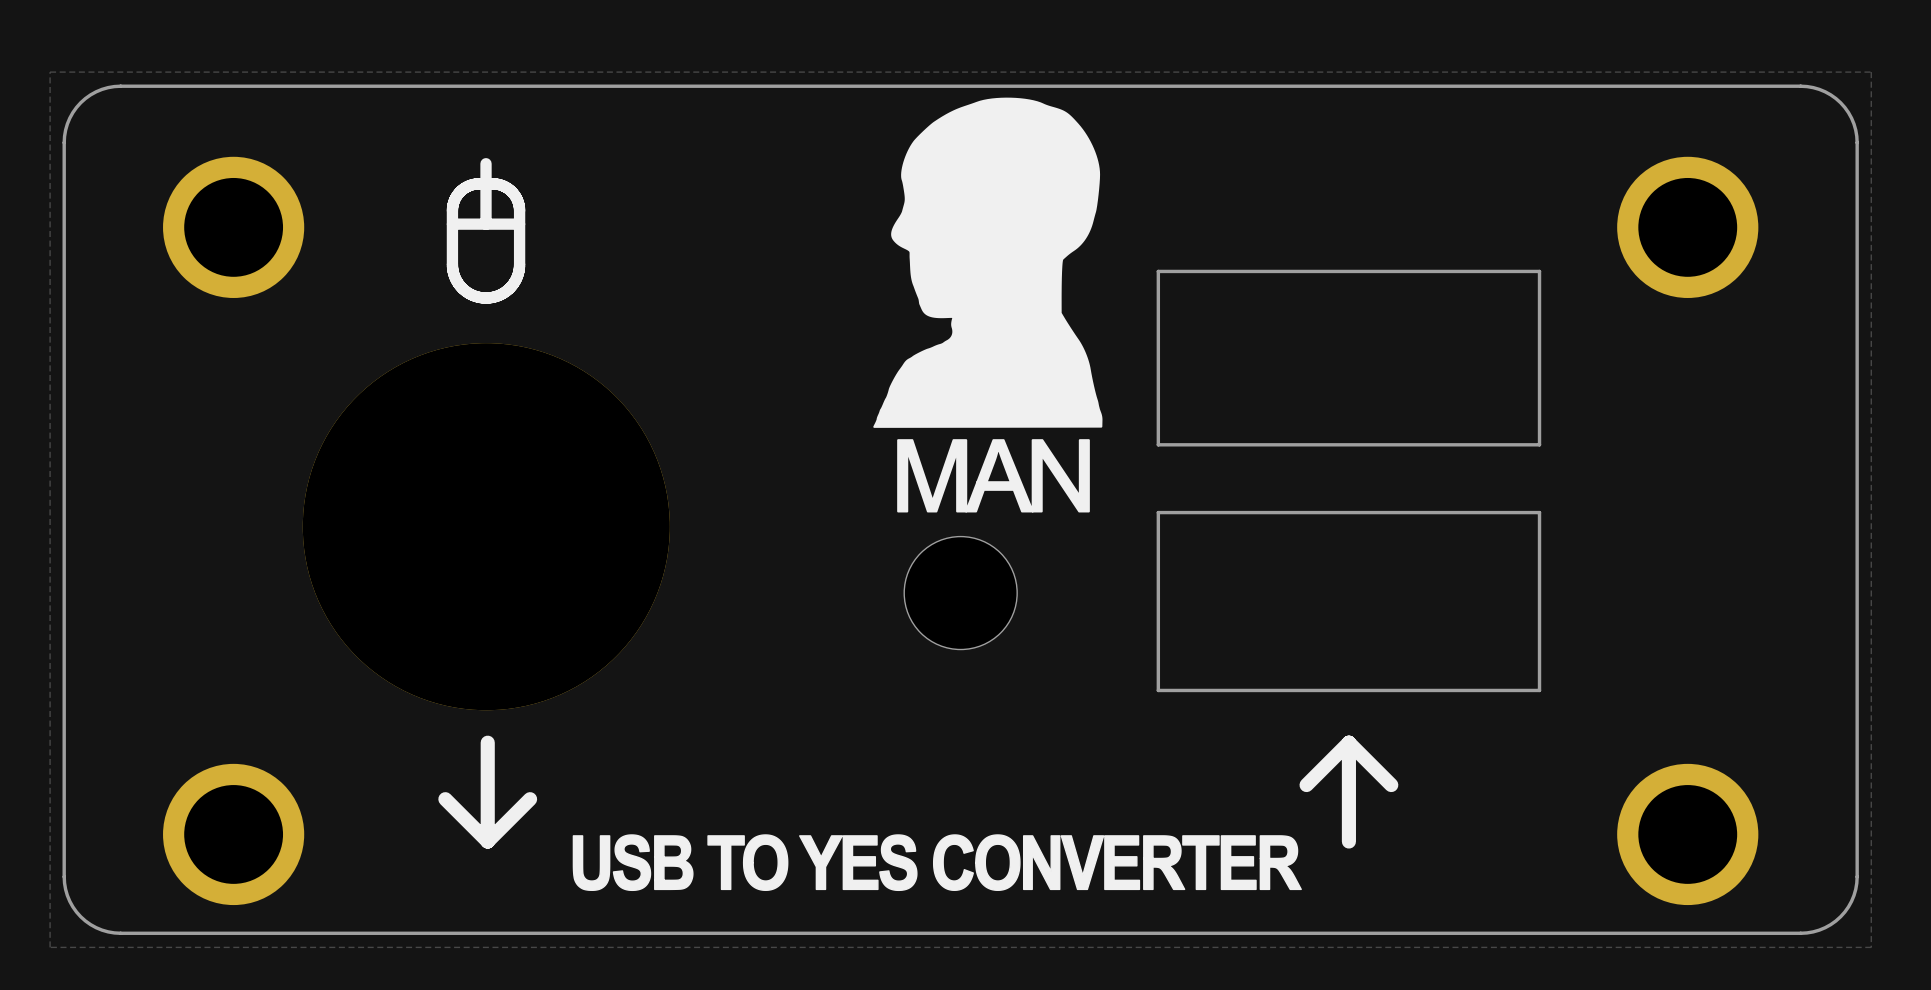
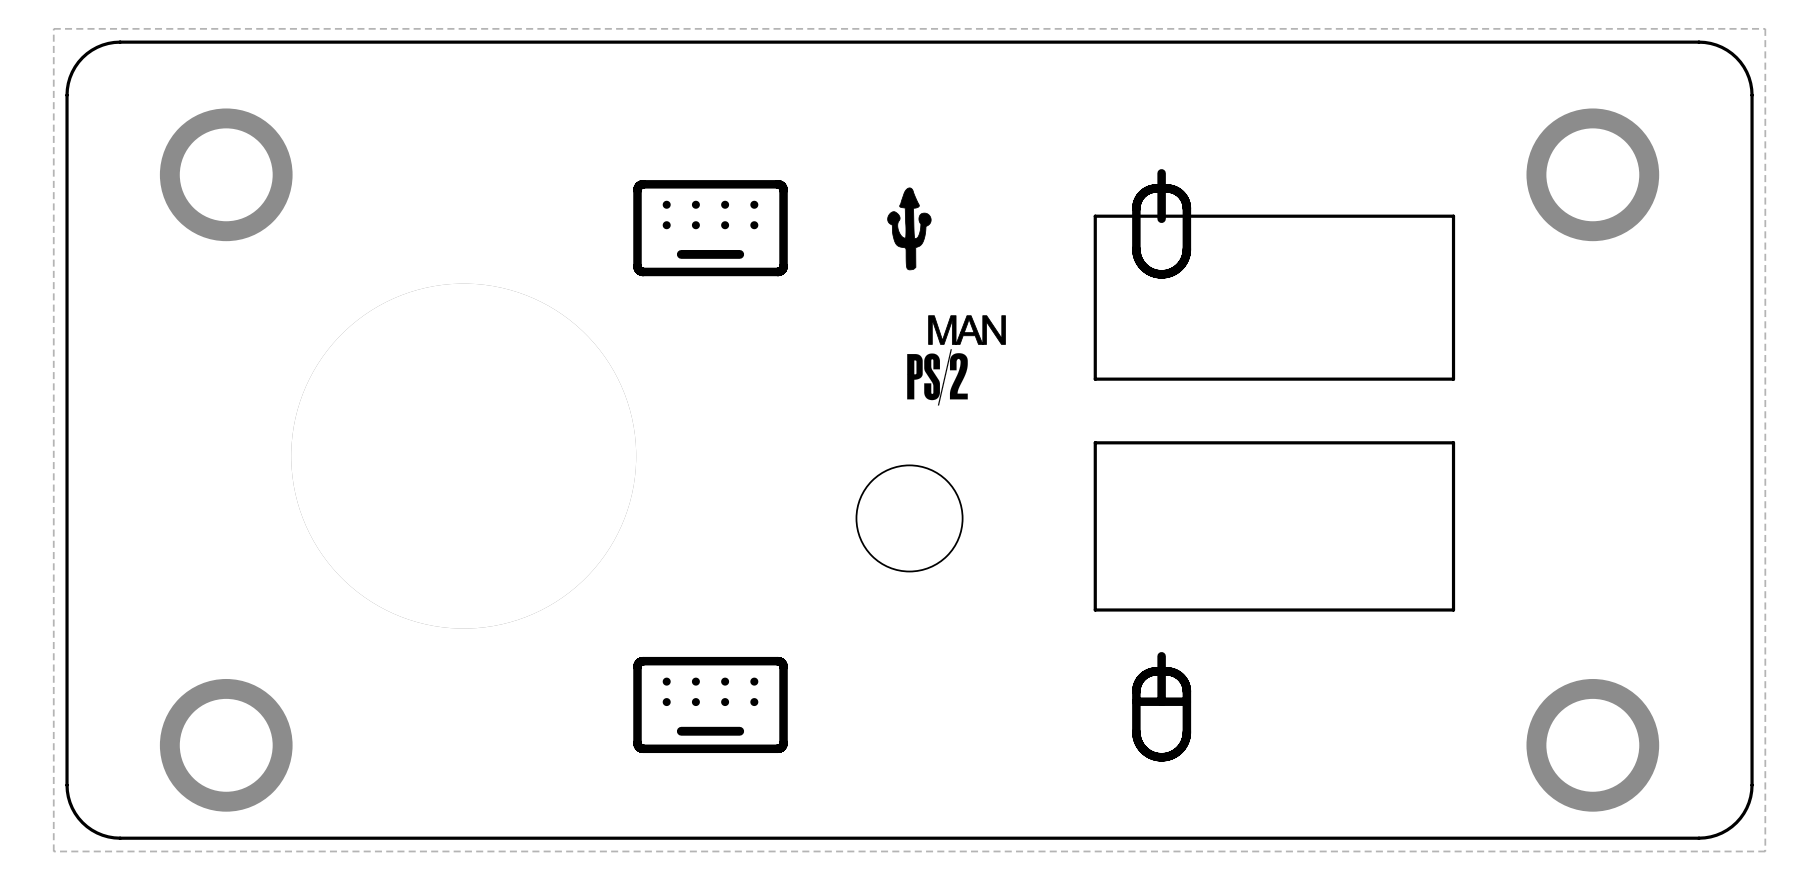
drawing: [873, 97, 1103, 513] -> none
line: (486, 163) (486, 224) -> none
line: (476, 183) (495, 183) (505, 187) (515, 195) (519, 207) (518, 274) (507, 290) (489, 297) (476, 296) (464, 290) (456, 280) (452, 267) (453, 202) (462, 189) (476, 183) -> none
line: (452, 224) (519, 224) -> none
line: none -> (1161, 173) (1161, 218)
line: none -> (643, 184) (777, 184)
drawing: none -> [887, 187, 932, 271]
line: none -> (1156, 188) (1169, 188) (1177, 191) (1183, 198) (1186, 206) (1185, 256) (1177, 268) (1164, 274) (1154, 273) (1145, 268) (1139, 261) (1136, 251) (1137, 202) (1144, 192) (1156, 188)
line: none -> (637, 190) (637, 266)
line: none -> (783, 190) (783, 266)
drawing: none -> [662, 200, 759, 230]
line: none -> (681, 254) (739, 254)
line: none -> (643, 271) (777, 271)
drawing: none -> [907, 315, 1006, 406]
line: none -> (1161, 656) (1161, 701)
line: (487, 742) (487, 841) -> none
line: (1348, 742) (1391, 785) -> none
line: (1348, 742) (1348, 841) -> none
line: (1348, 742) (1306, 785) -> none
line: none -> (643, 661) (777, 661)
line: none -> (637, 667) (637, 742)
line: none -> (783, 667) (783, 742)
line: none -> (1156, 671) (1144, 675) (1137, 685) (1136, 734) (1139, 744) (1145, 751) (1154, 756) (1164, 757) (1177, 751) (1185, 739) (1186, 689) (1183, 681) (1177, 674) (1169, 671) (1156, 671)
drawing: none -> [662, 677, 759, 707]
line: none -> (1136, 701) (1186, 701)
line: (445, 799) (487, 841) -> none
line: (530, 799) (487, 841) -> none
line: none -> (681, 731) (739, 731)
drawing: [572, 834, 1302, 892] -> none
line: none -> (643, 748) (777, 748)

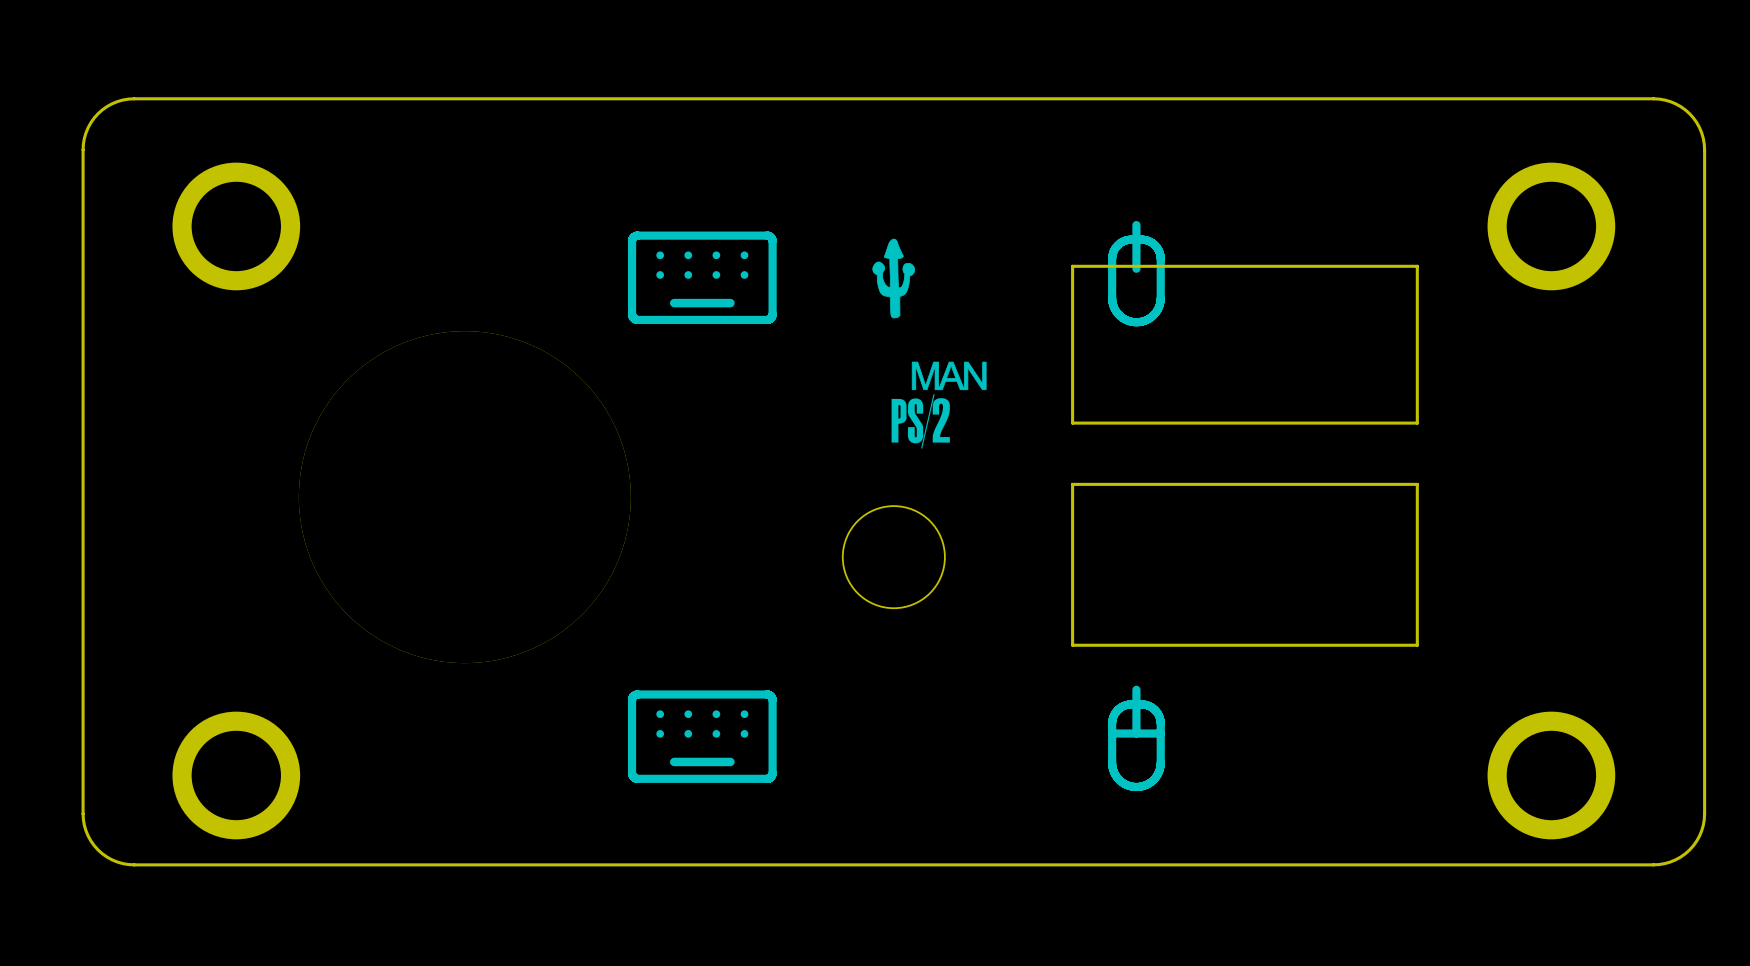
zone outline: (53, 28) (53, 851) (1765, 851) (1765, 28) (53, 28) -> none

